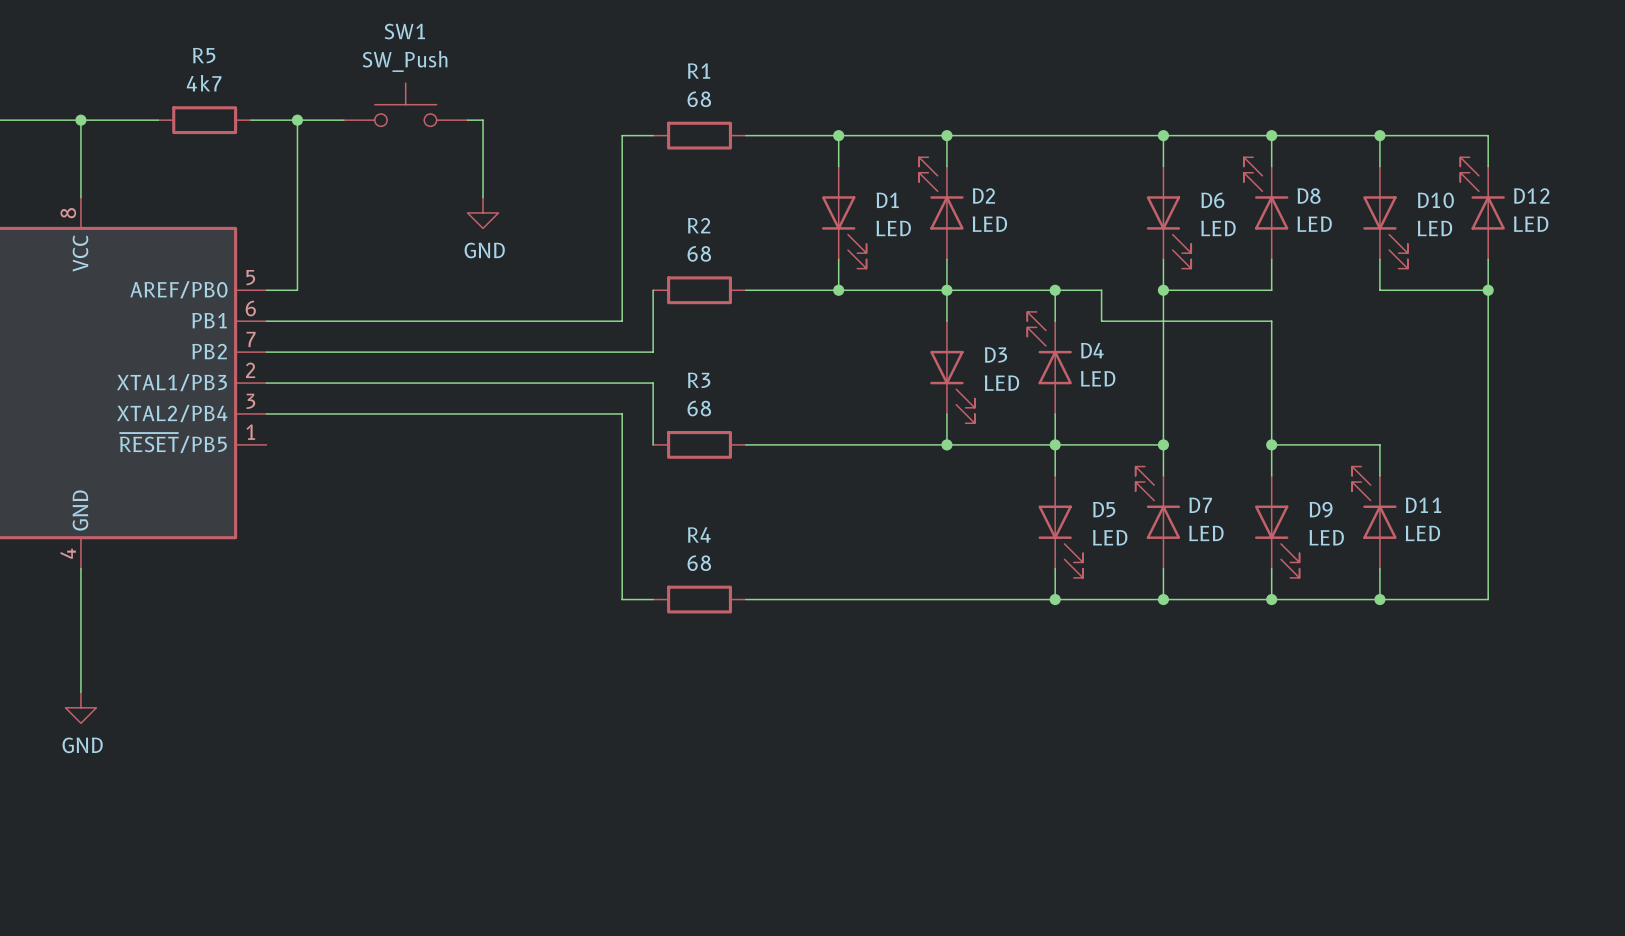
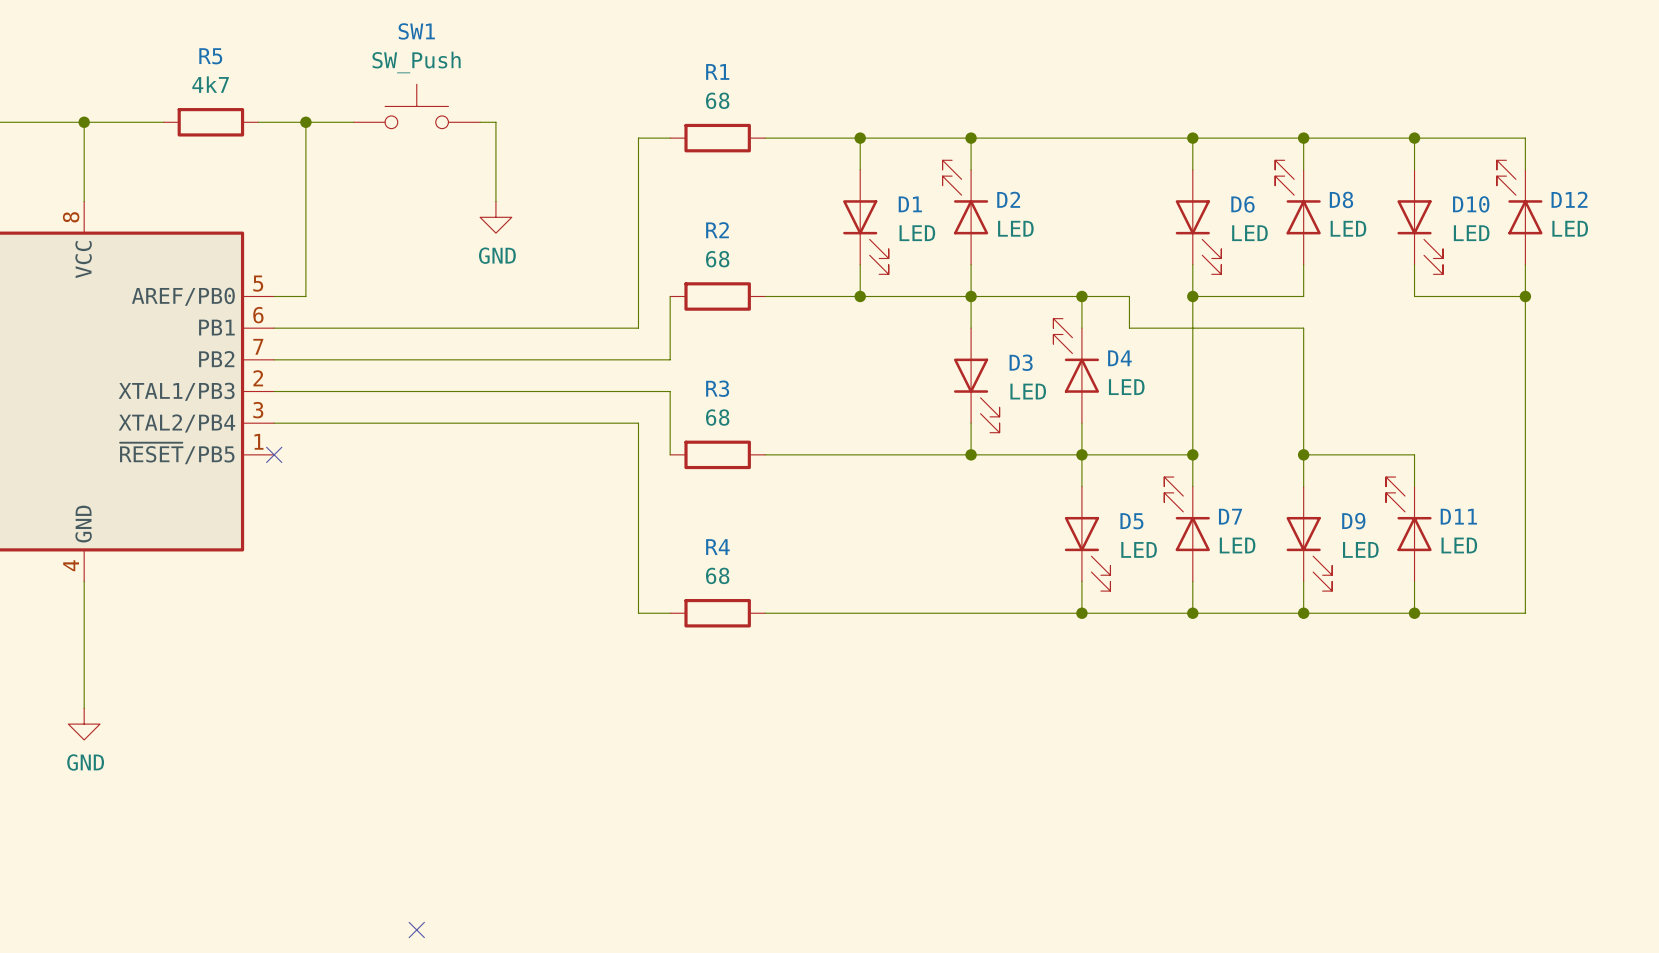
no-connect mark: none -> (274, 454)
no-connect mark: none -> (416, 929)

